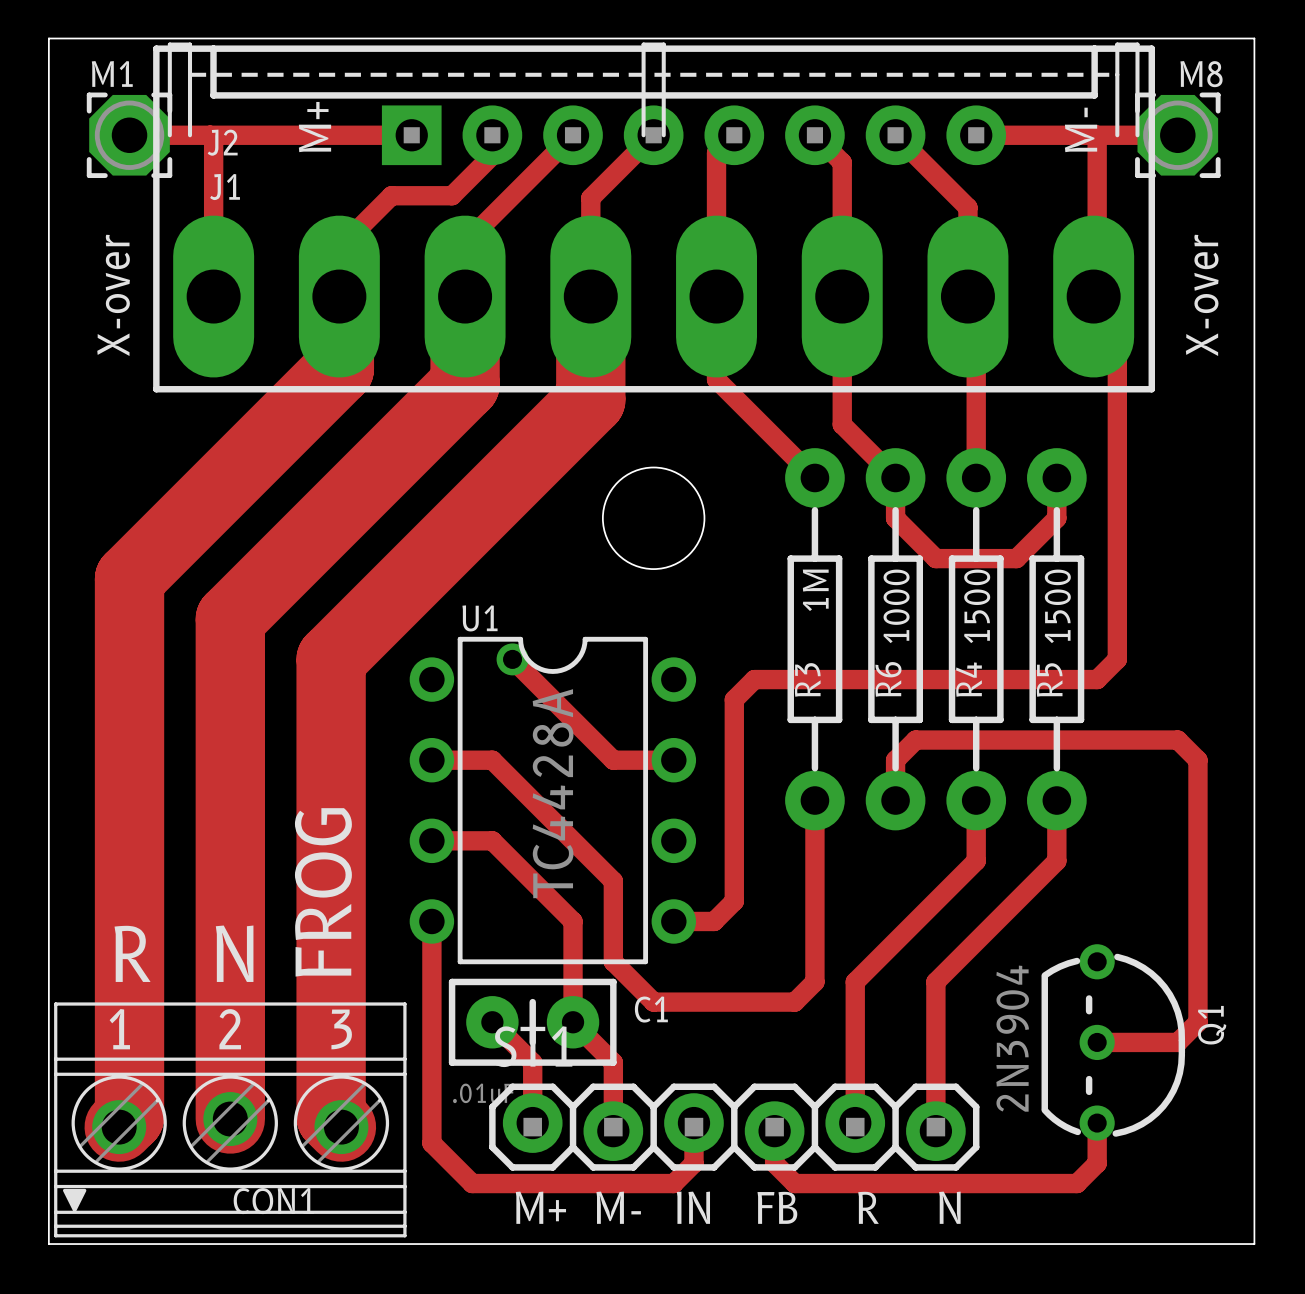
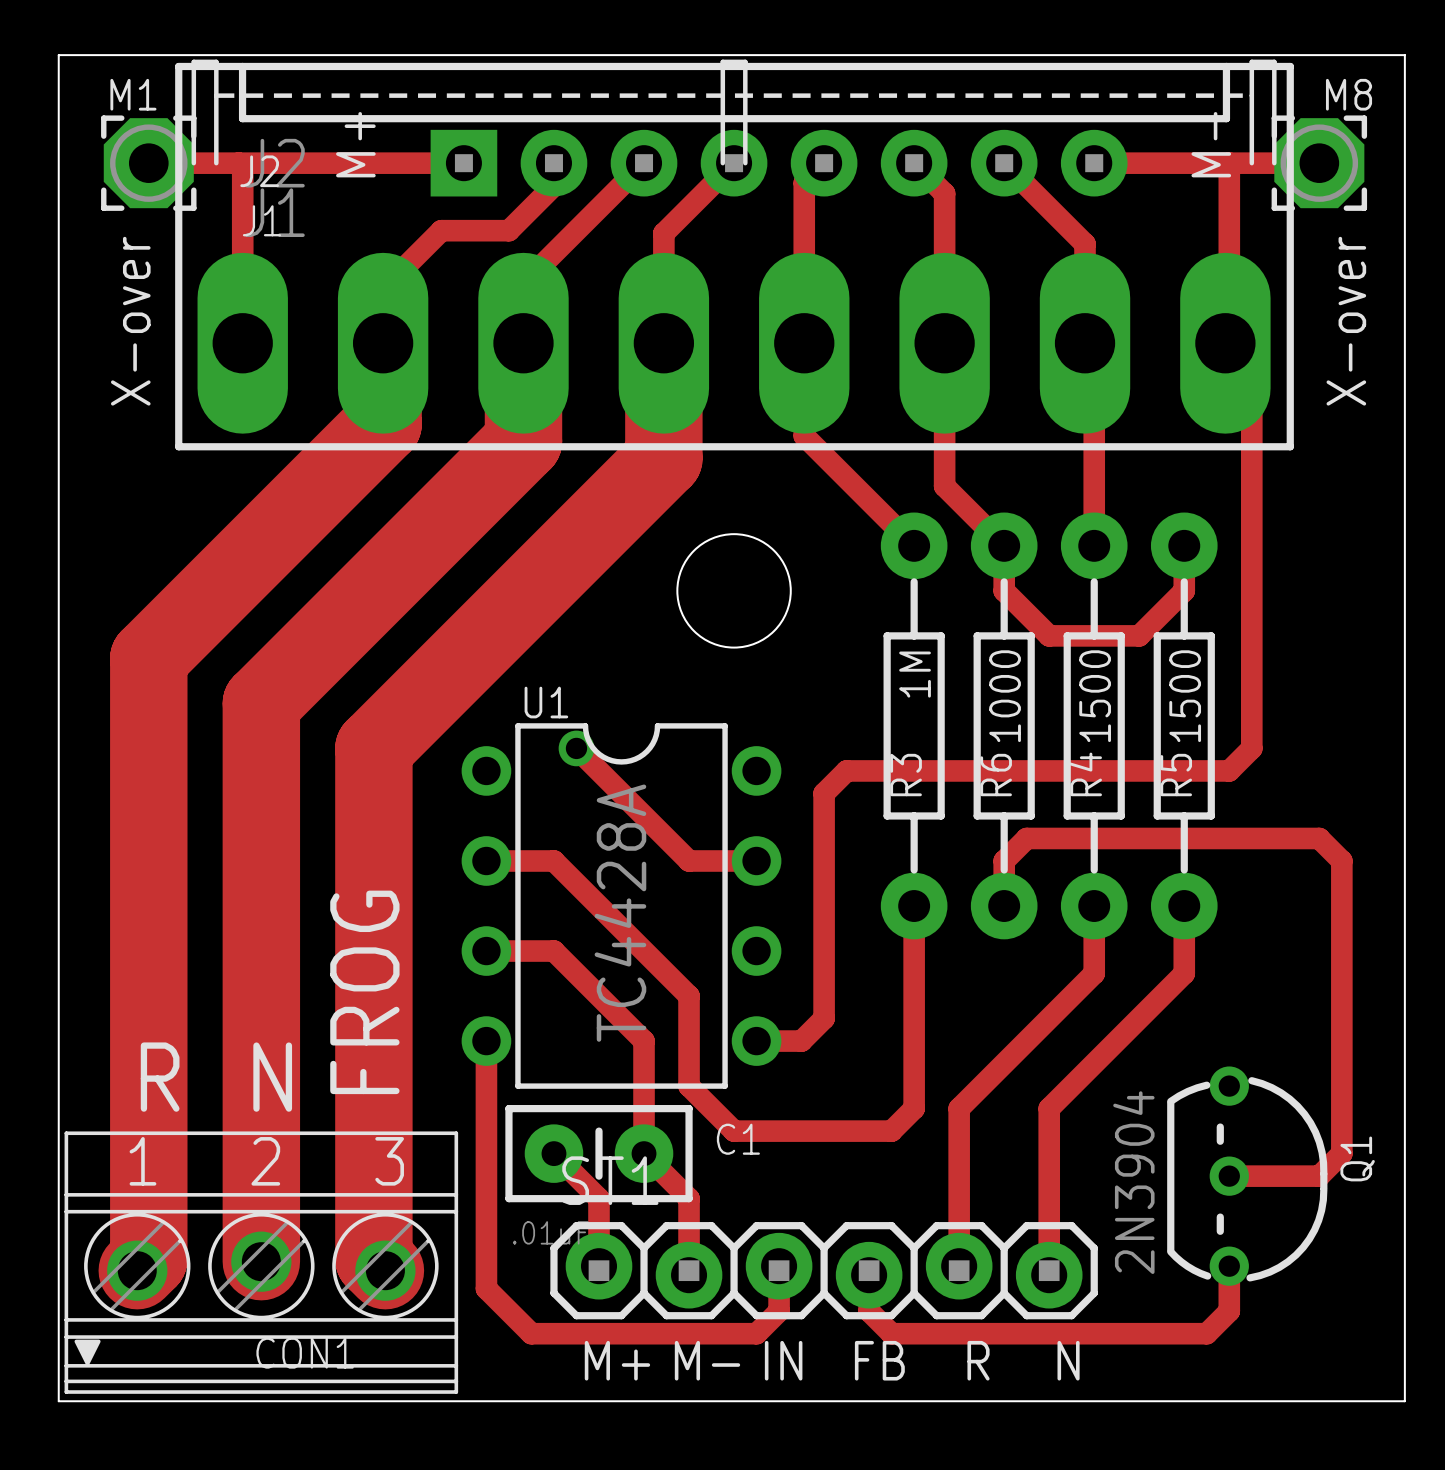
J2 value: none -> J2 (274, 163)
J1 value: none -> J1 (274, 212)

